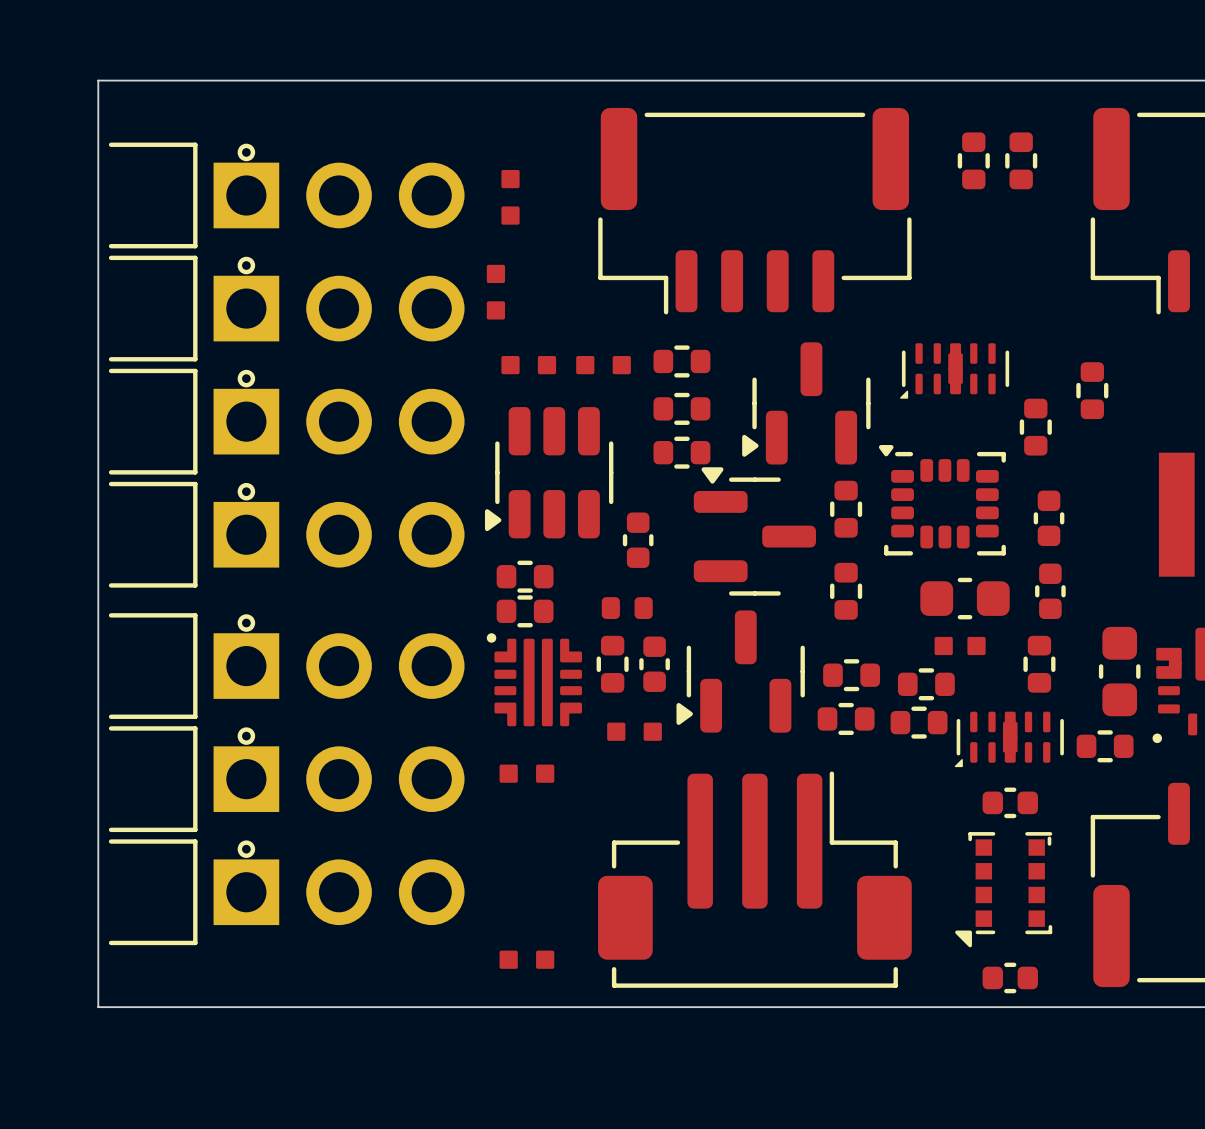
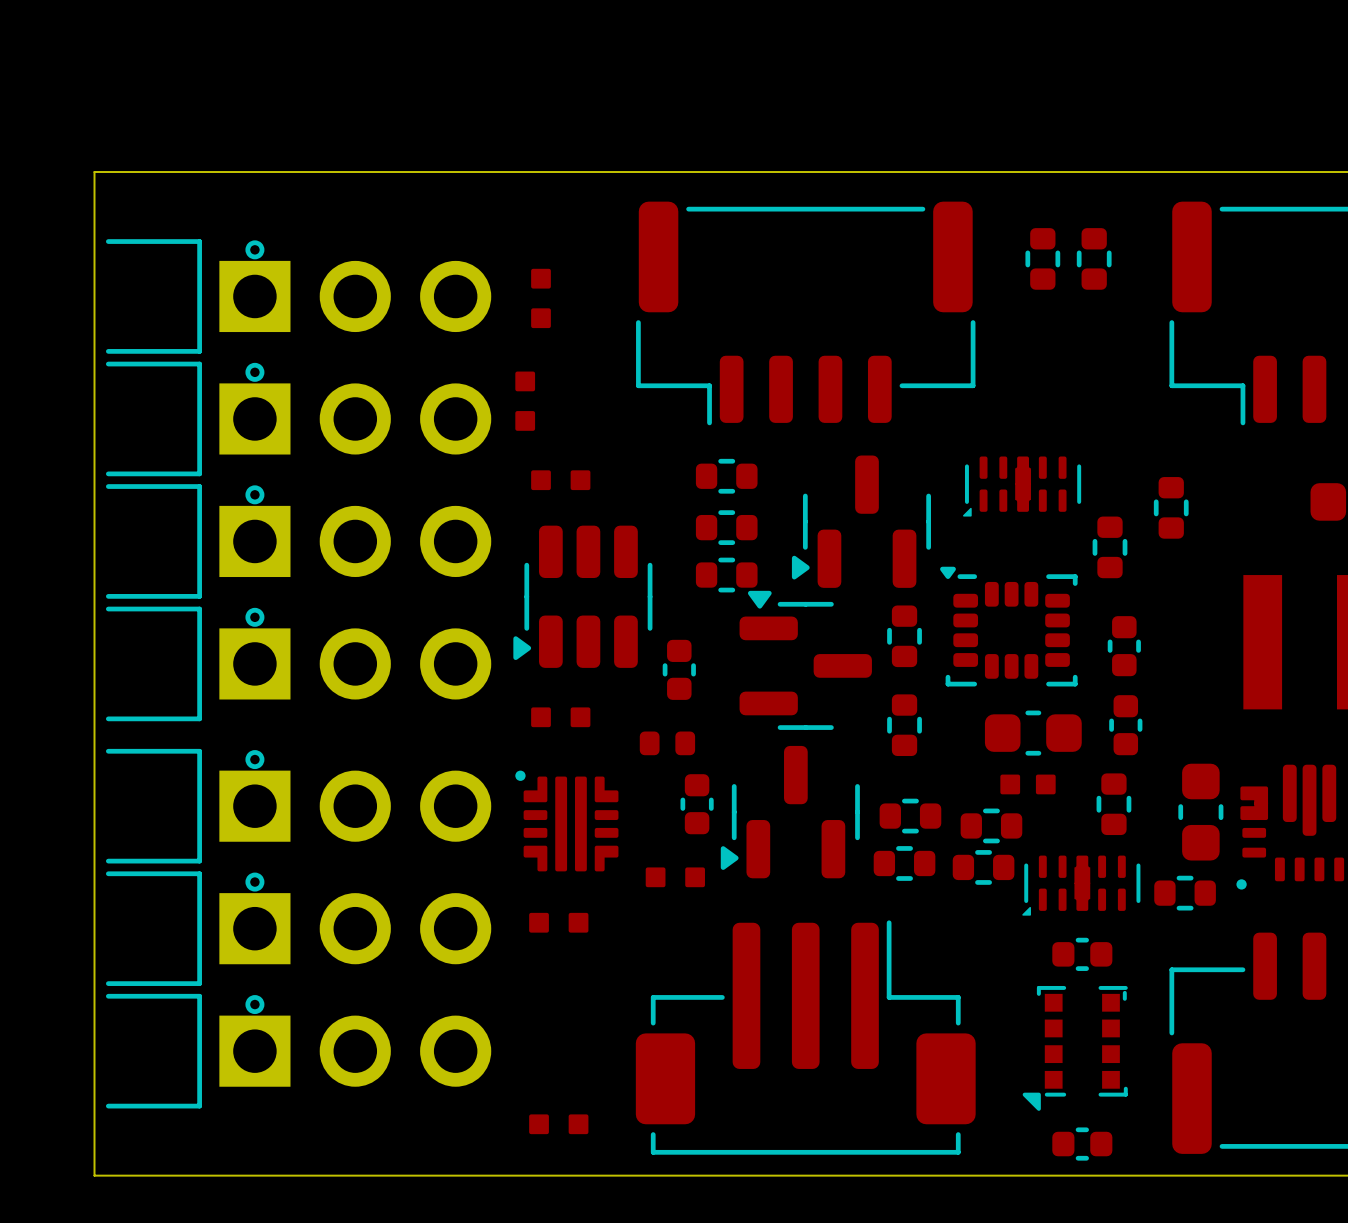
part: (603, 365) -> none
part footprint: [496, 560, 554, 593] -> [531, 707, 591, 728]
part: (525, 611) -> none
part: (612, 664) -> none

